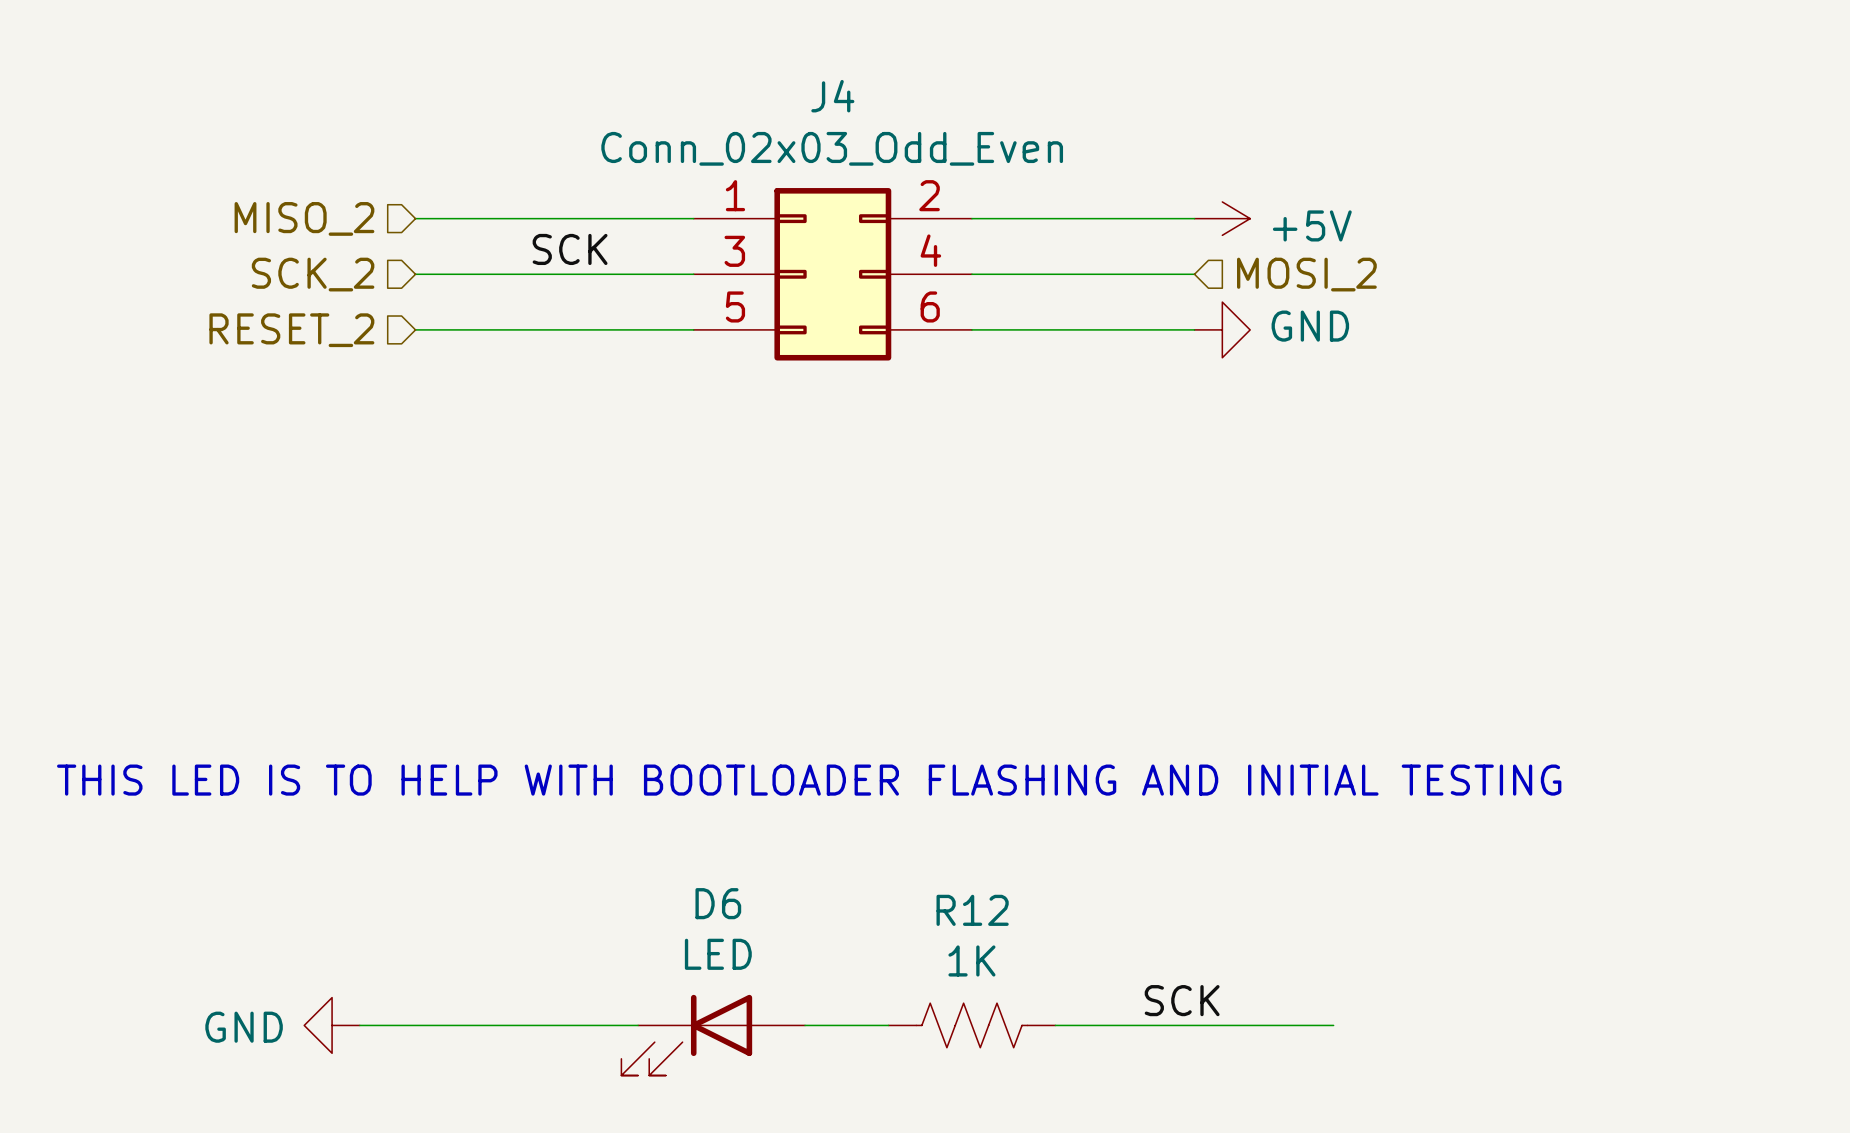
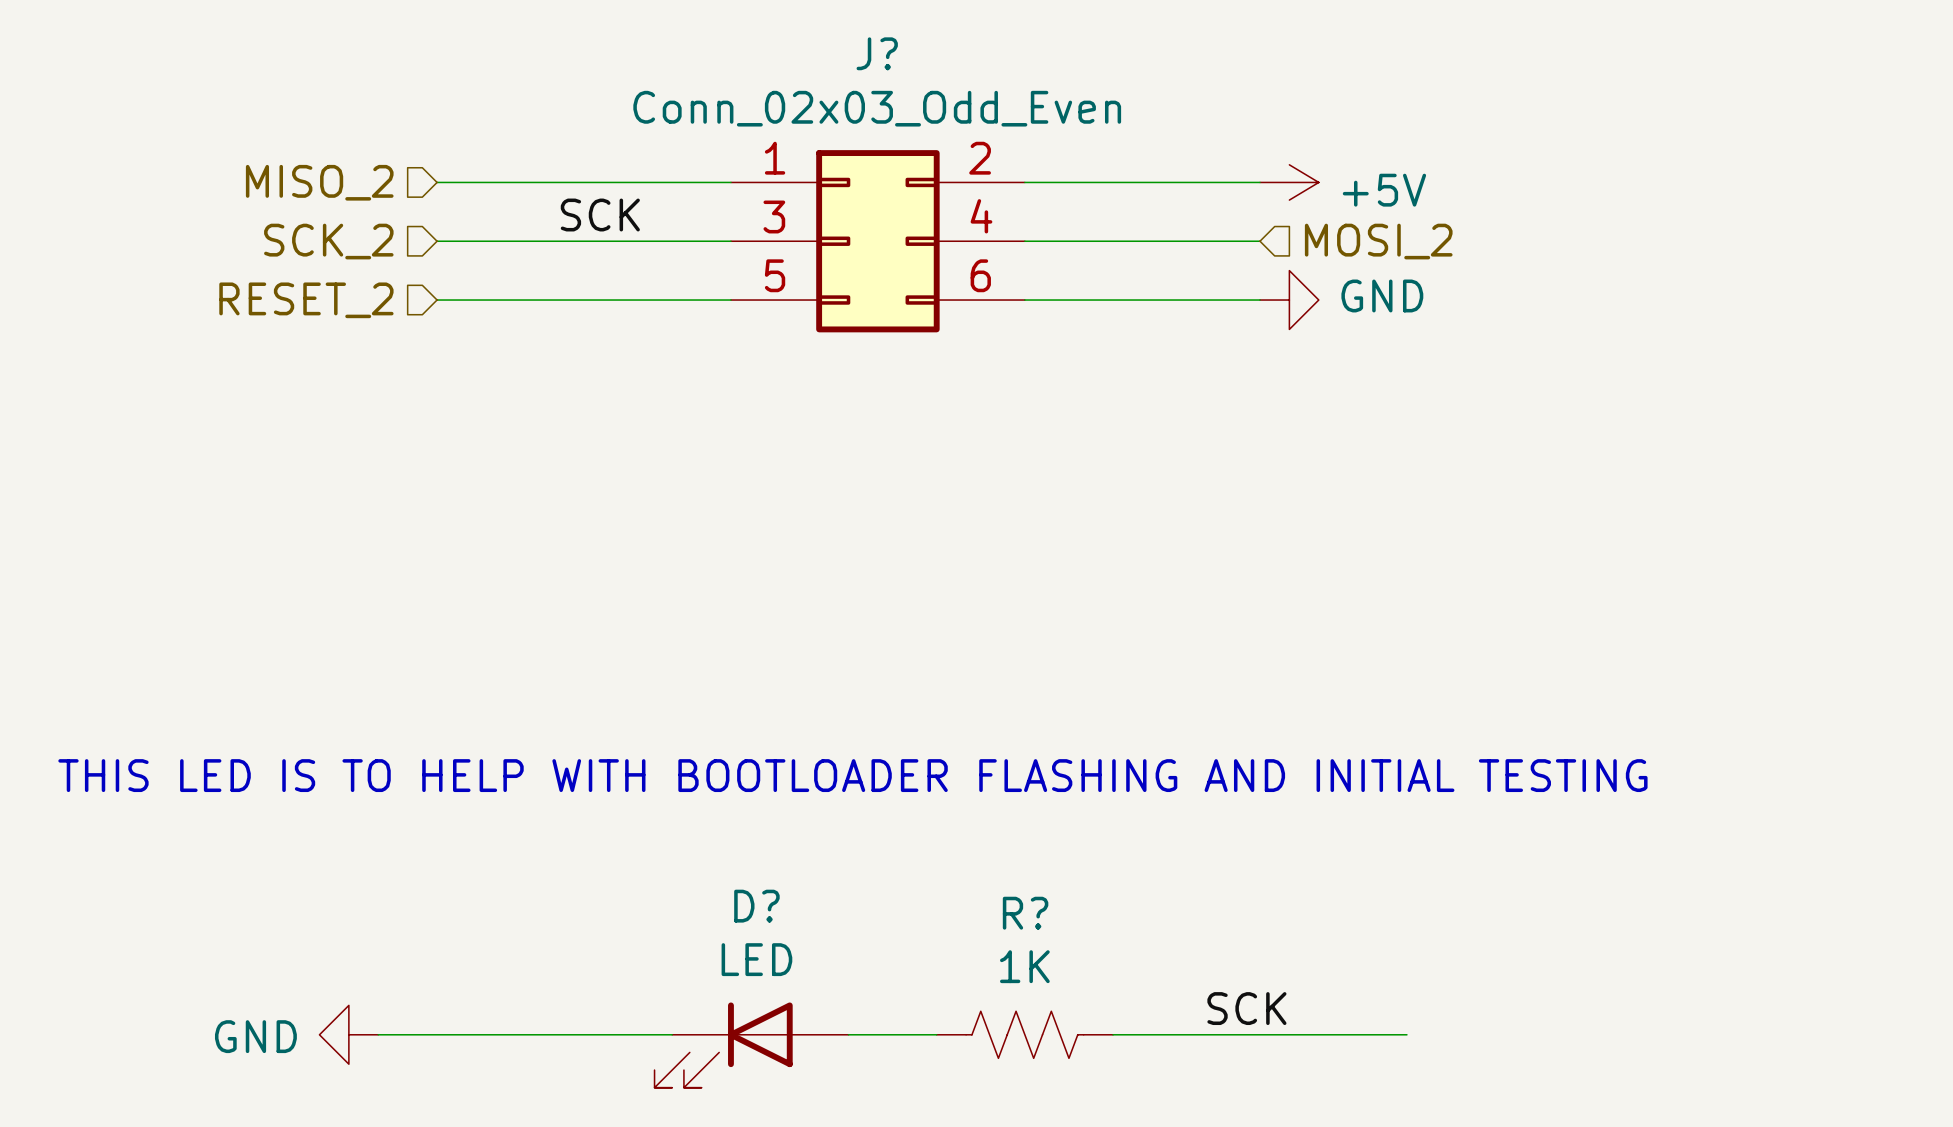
J4 name: J4 (832, 96) -> J? (877, 53)
D6 name: D6 (718, 903) -> D? (756, 906)
R12 name: R12 (972, 910) -> R? (1025, 913)

